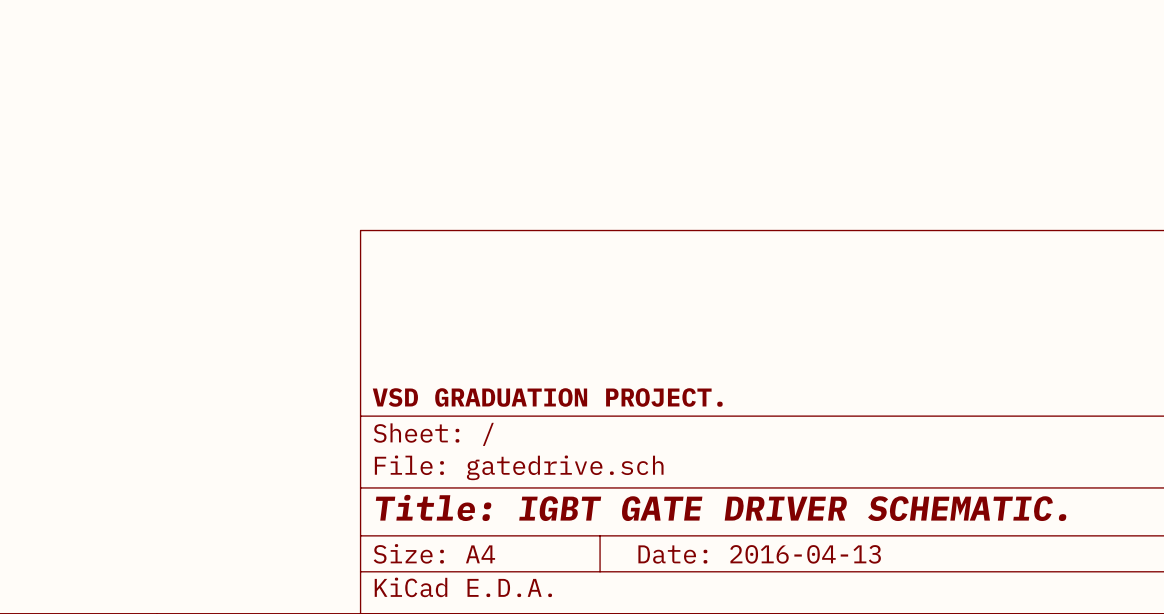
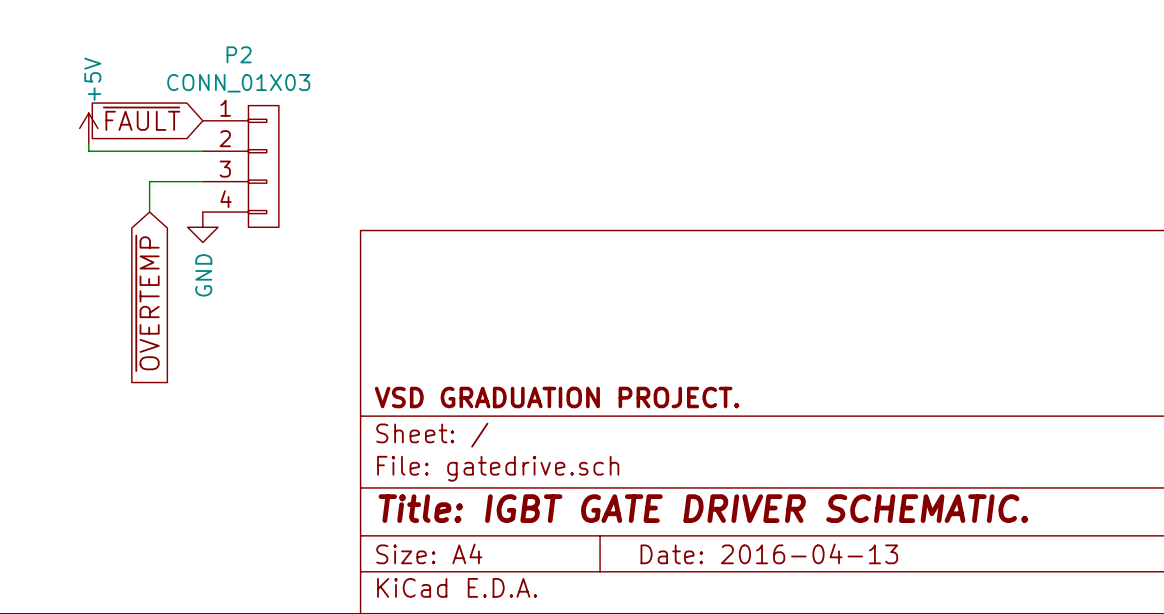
global label: none -> ~{FAULT} (141, 118)
power symbol: none -> +5V (88, 128)
wire: none -> (88, 143) (88, 151) (202, 151)
P2: none -> CONN_01X03 (240, 166)
wire: none -> (202, 181) (149, 181) (149, 212)
power symbol: none -> GND (202, 227)
global label: none -> ~{OVERTEMP} (147, 303)

